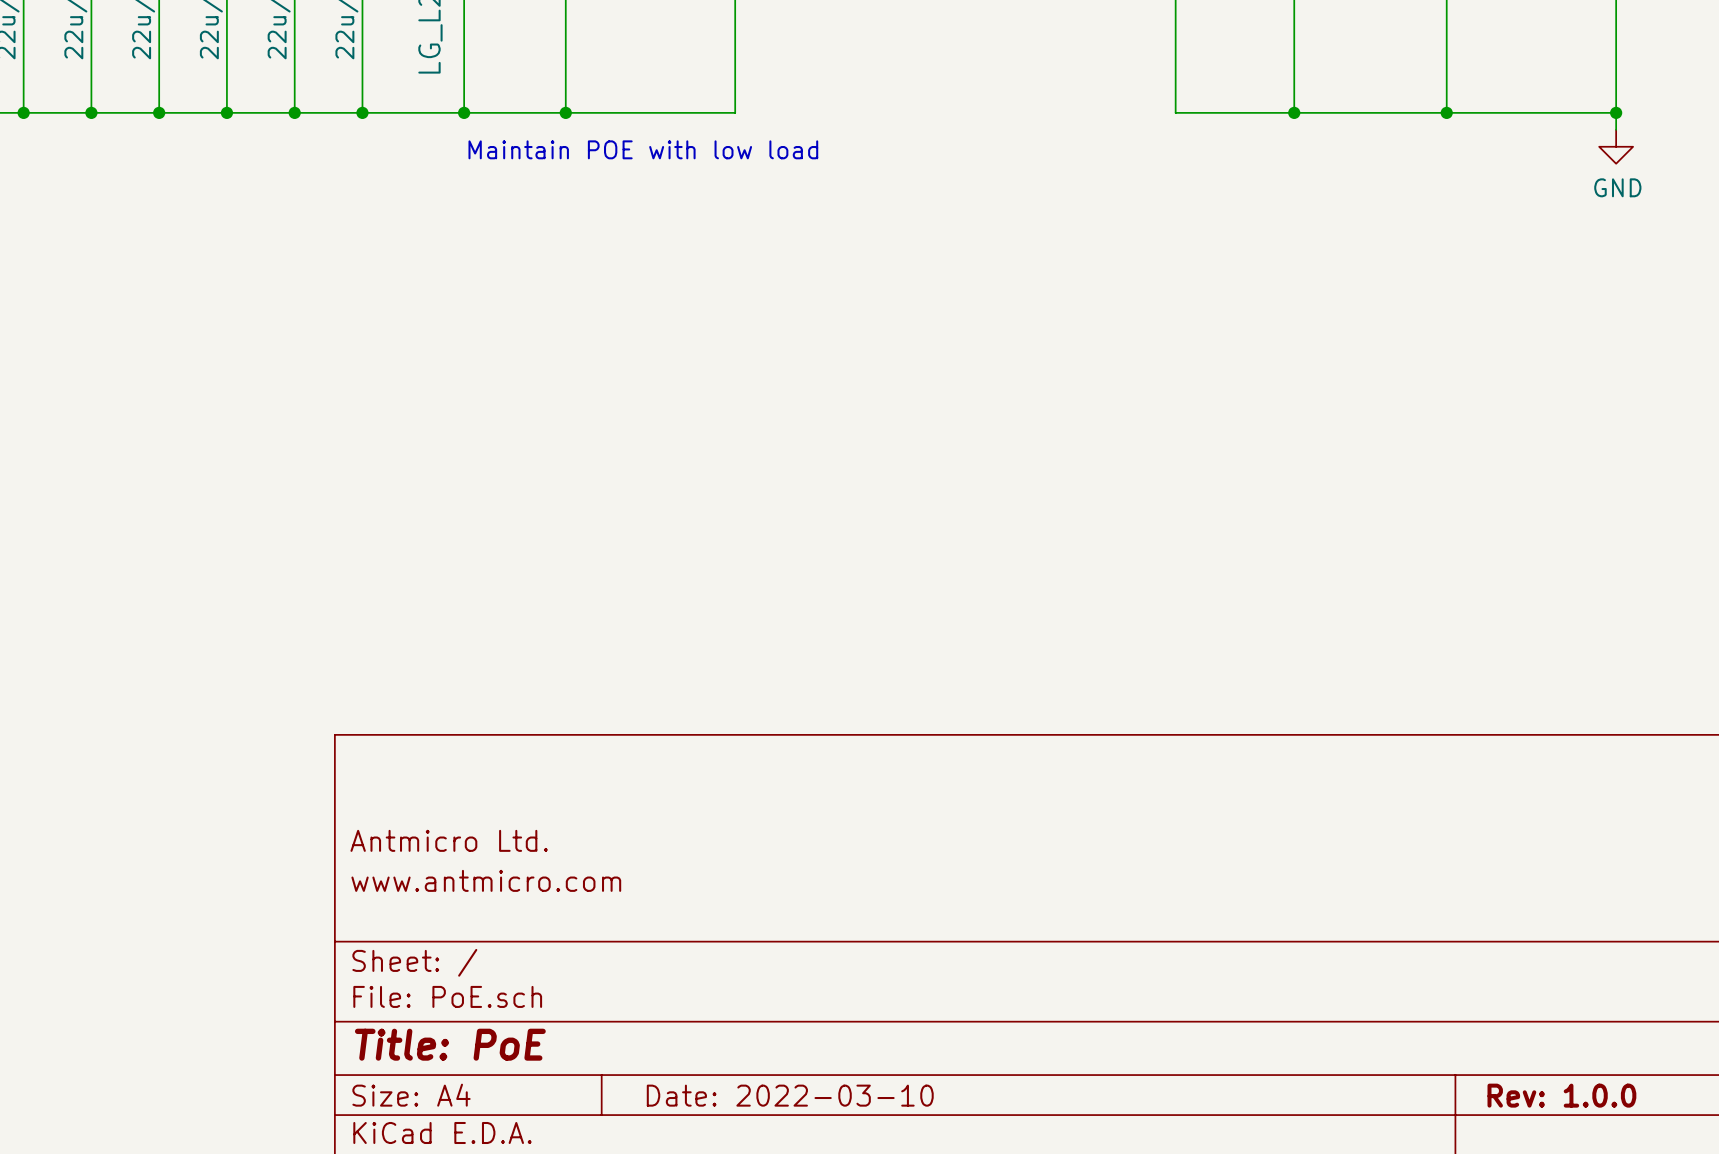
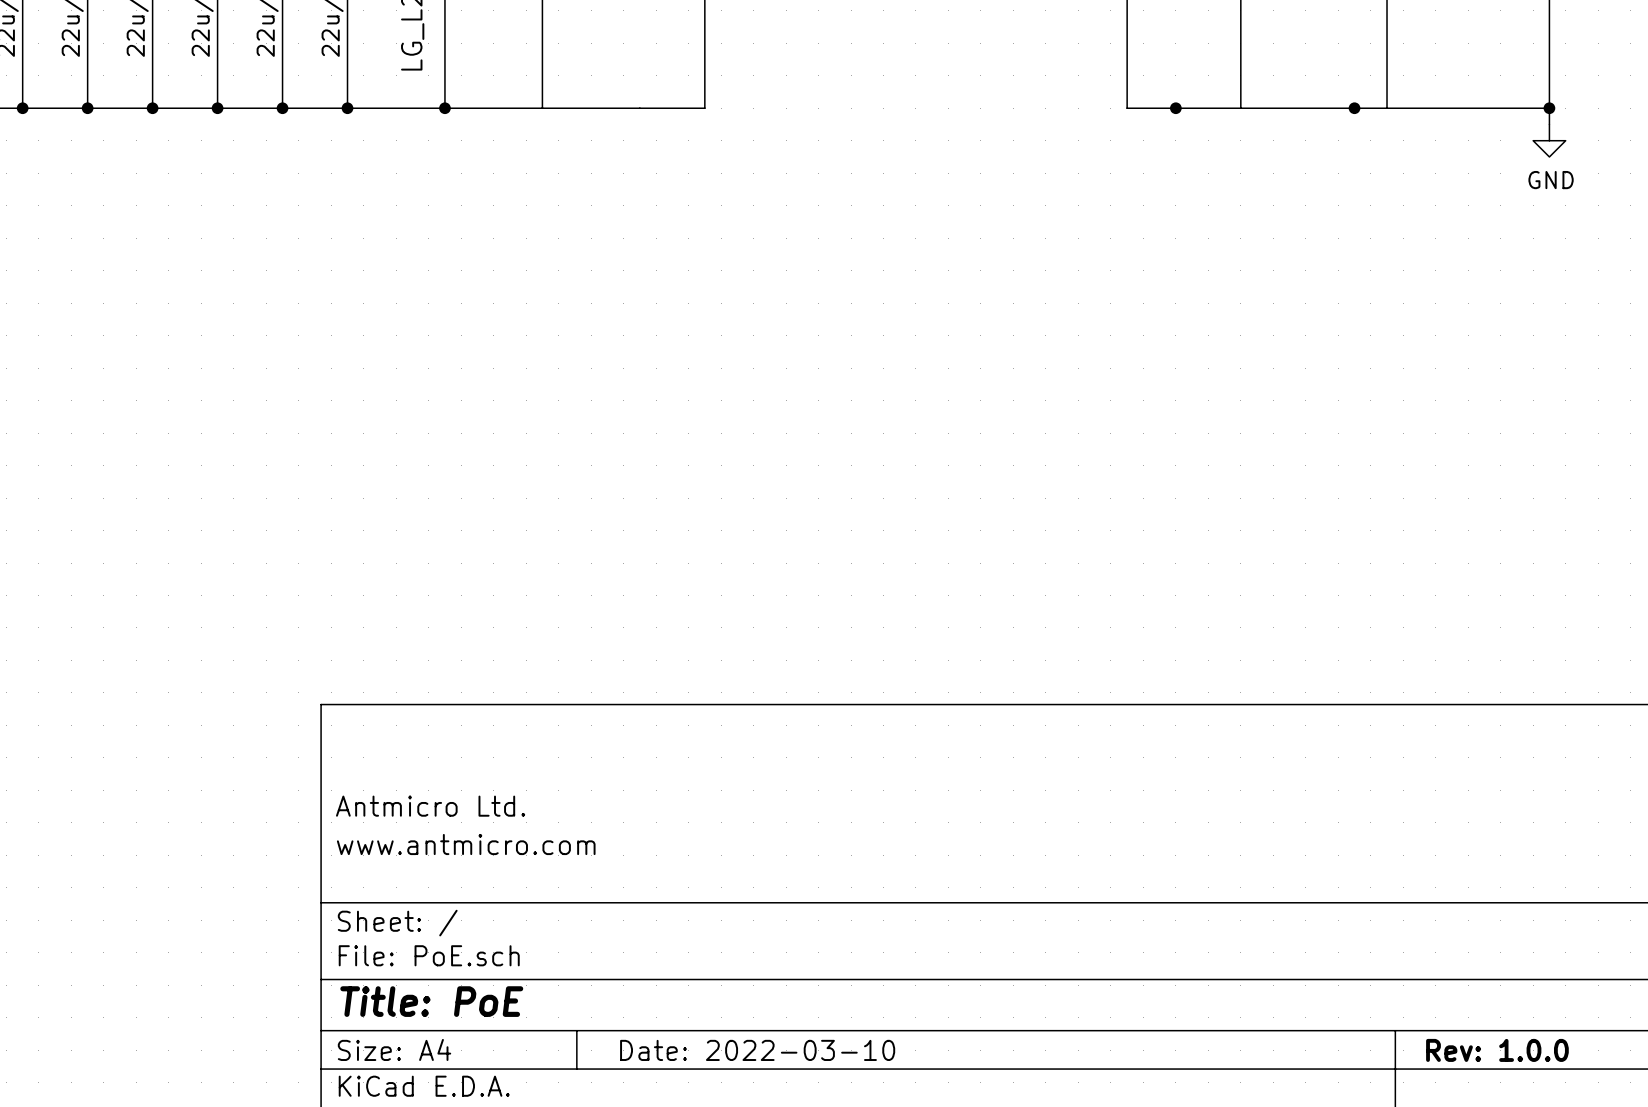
junction: (565, 112) -> none
junction: none -> (1175, 108)
junction: (1294, 112) -> none
junction position: (1446, 112) -> (1354, 108)
text: Maintain POE with low load (643, 149) -> none

